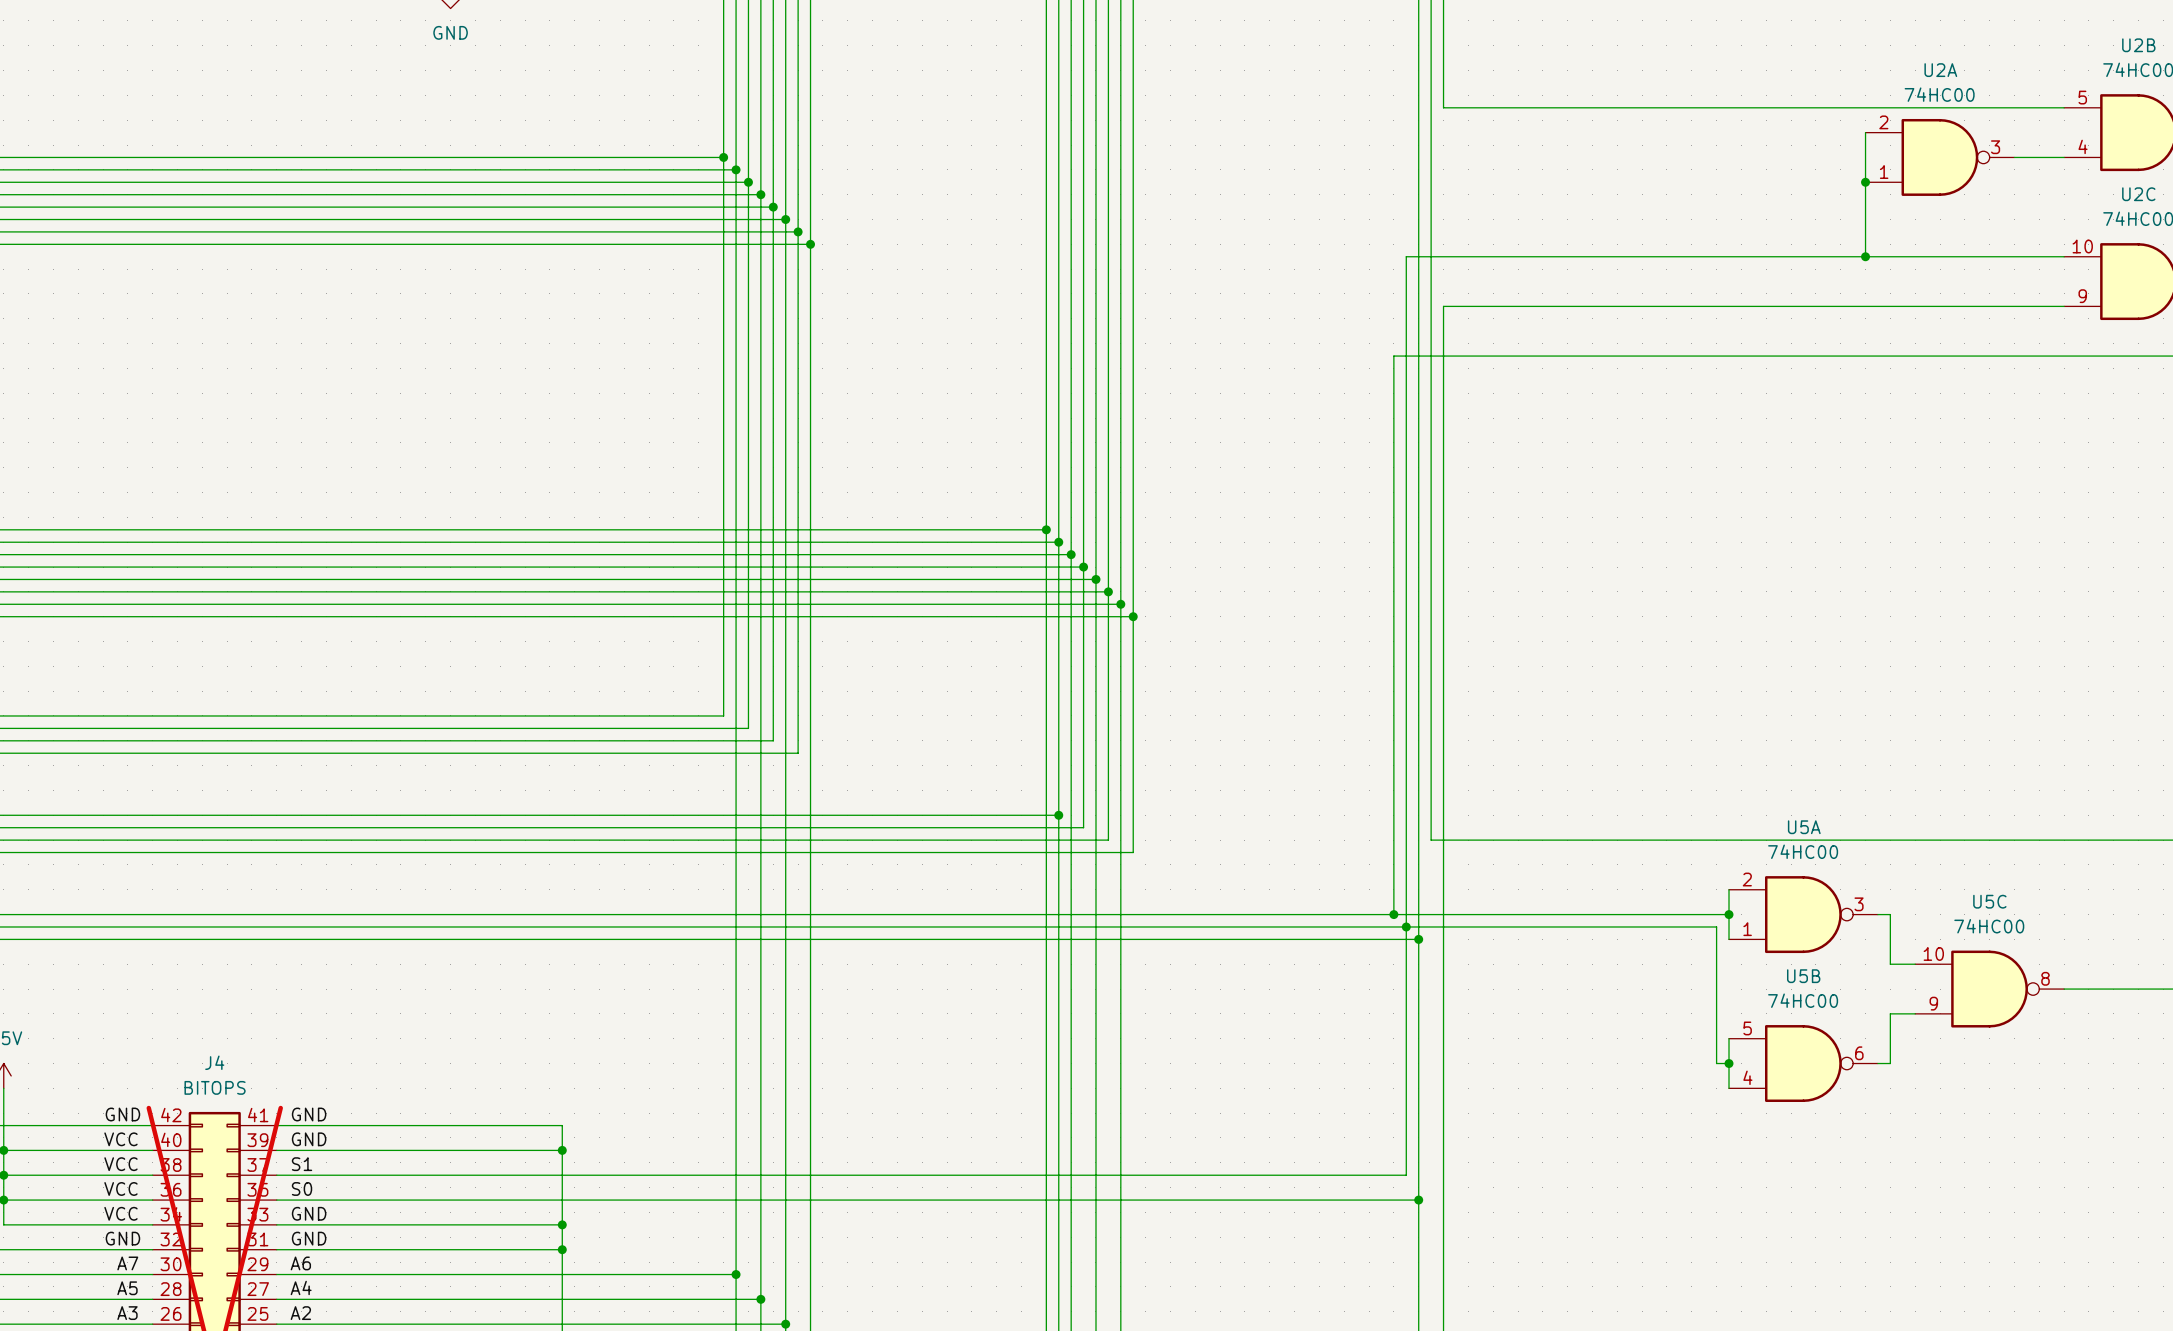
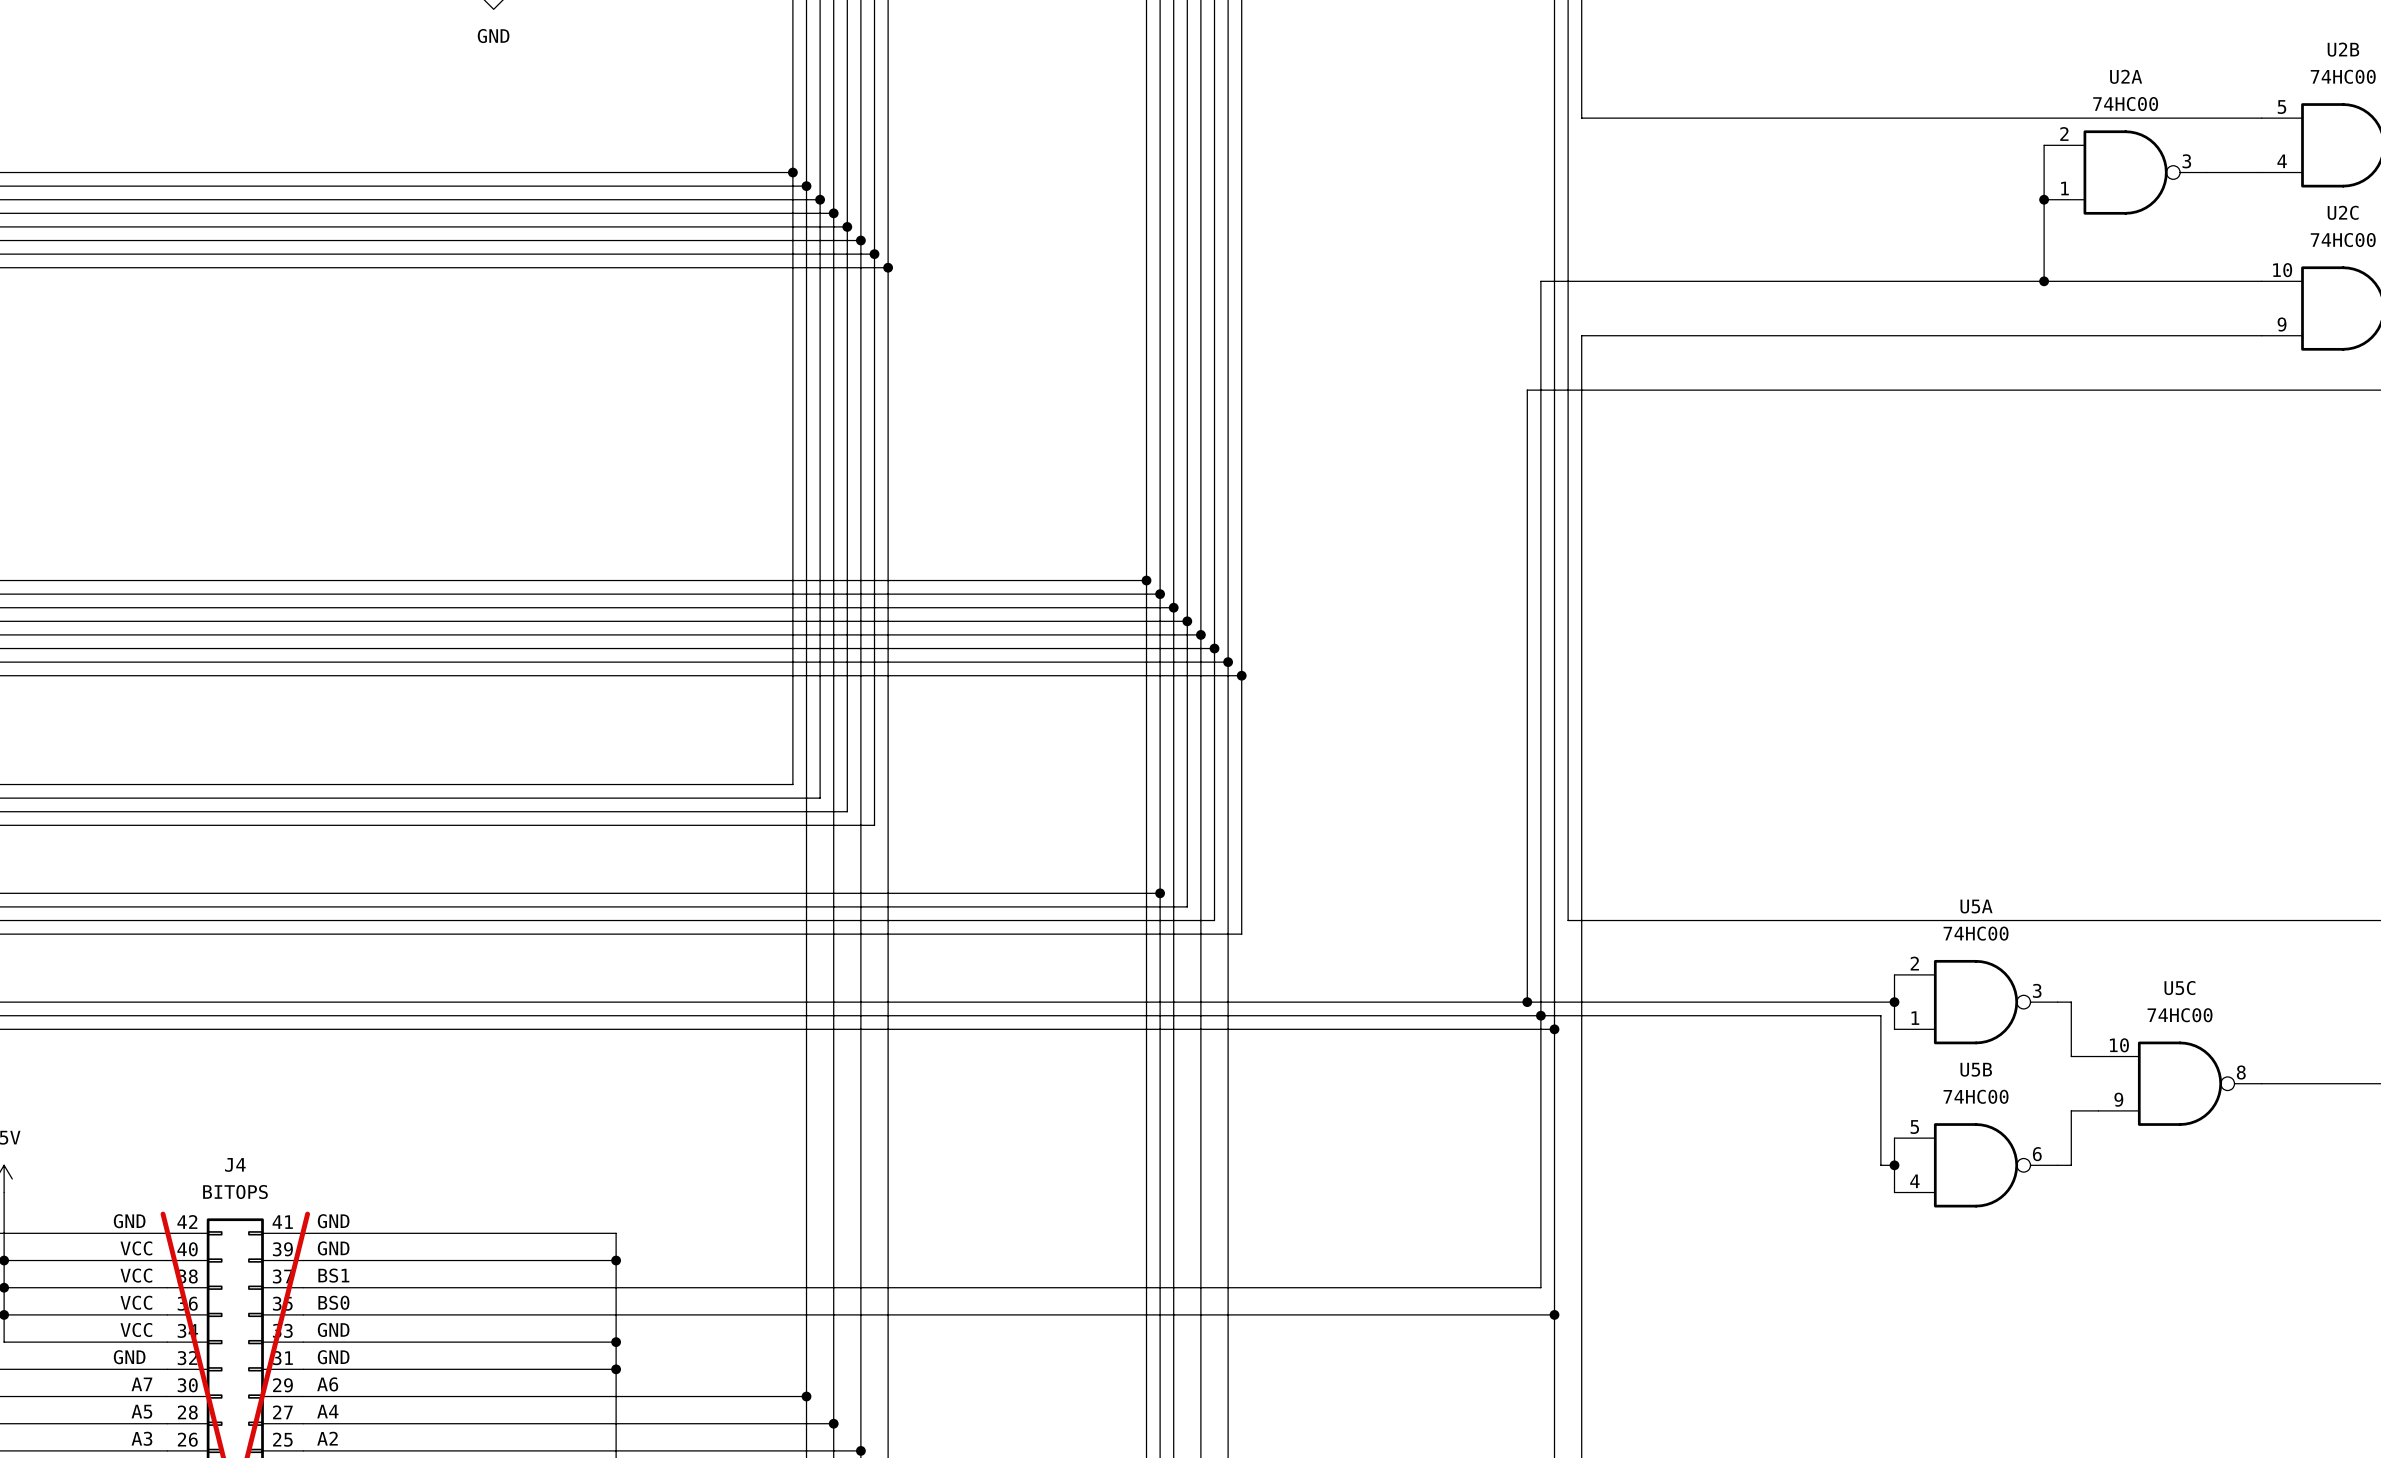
label: S1 (302, 1164) -> BS1 (333, 1275)
label: S0 (302, 1188) -> BS0 (333, 1302)

